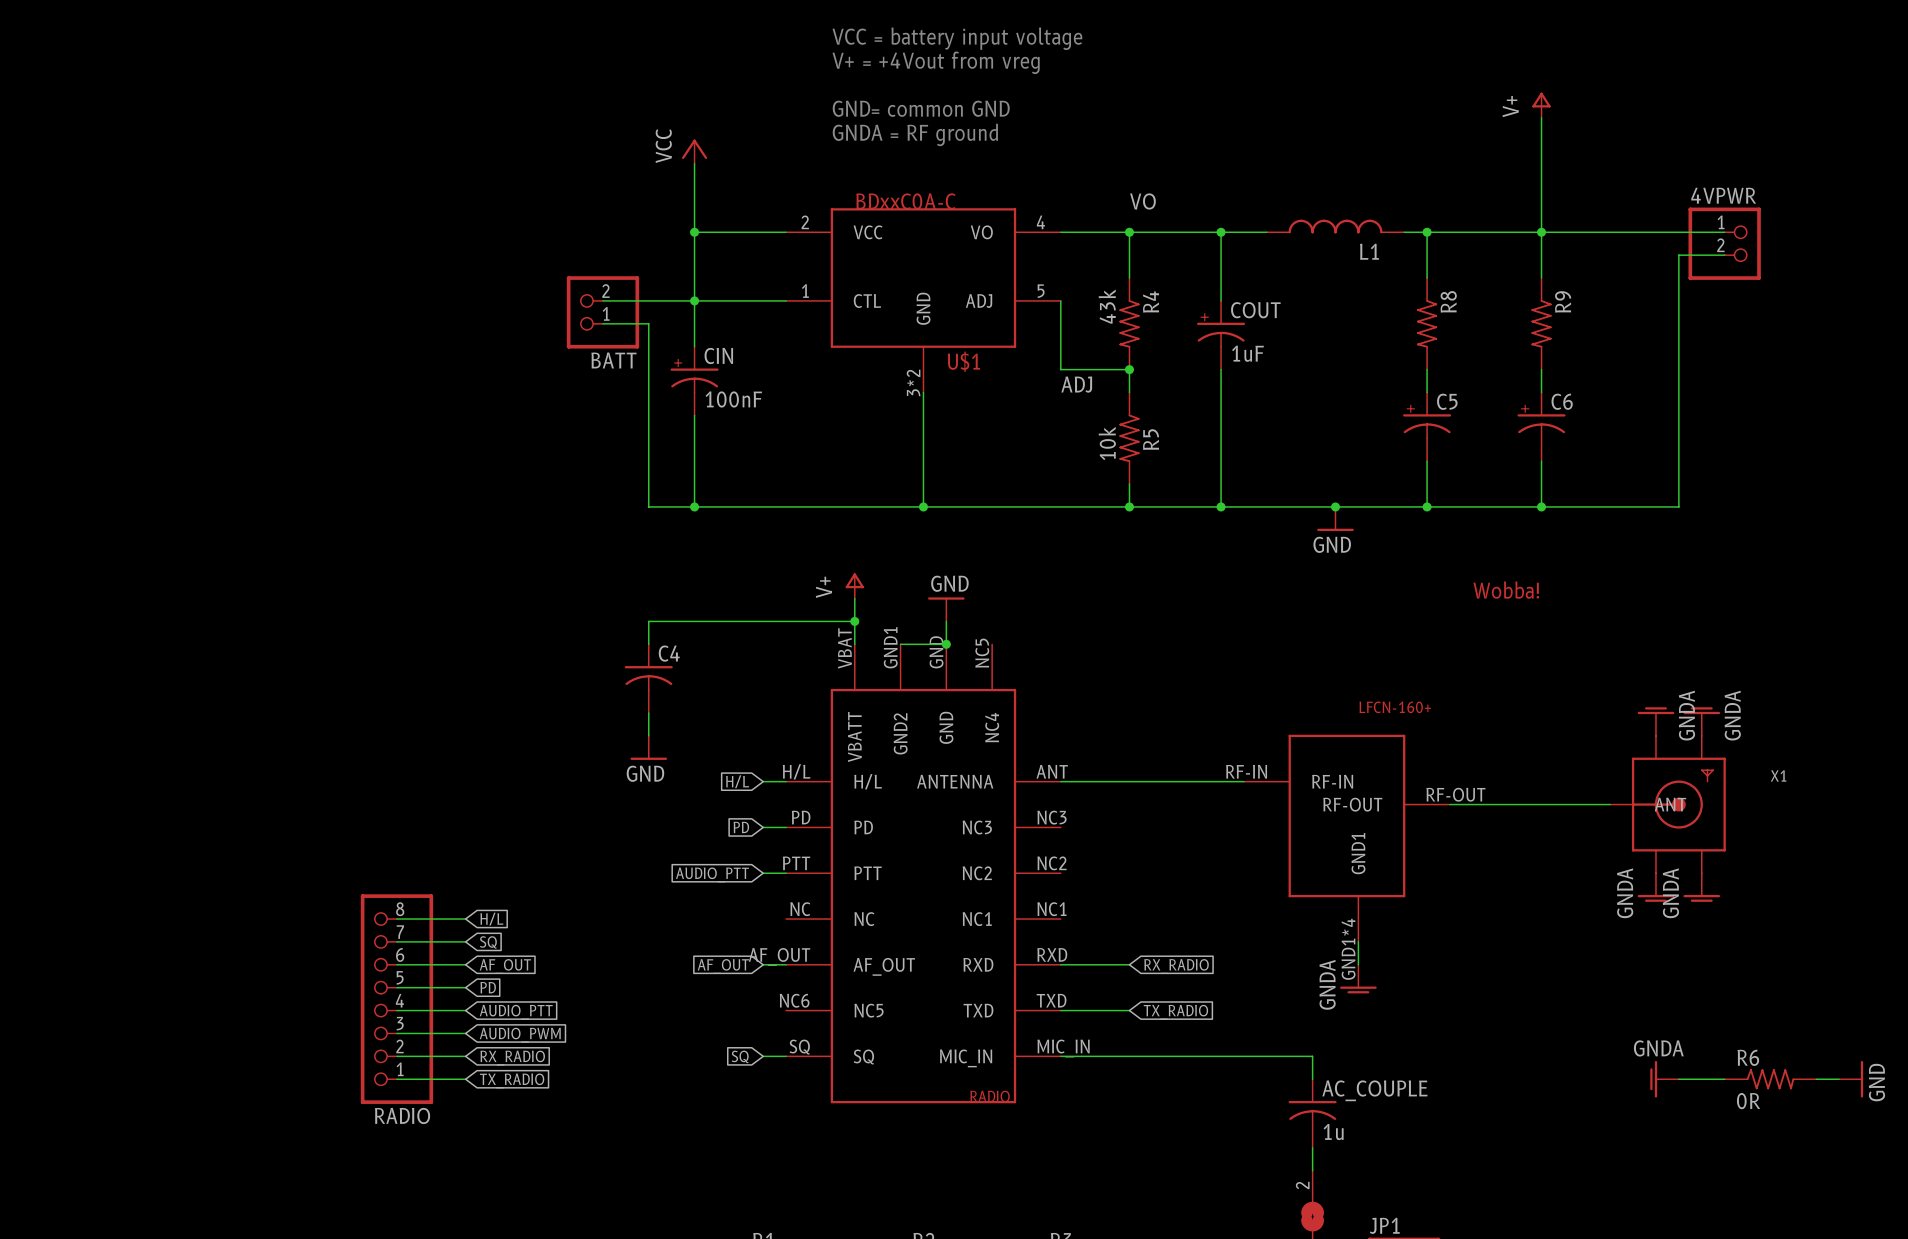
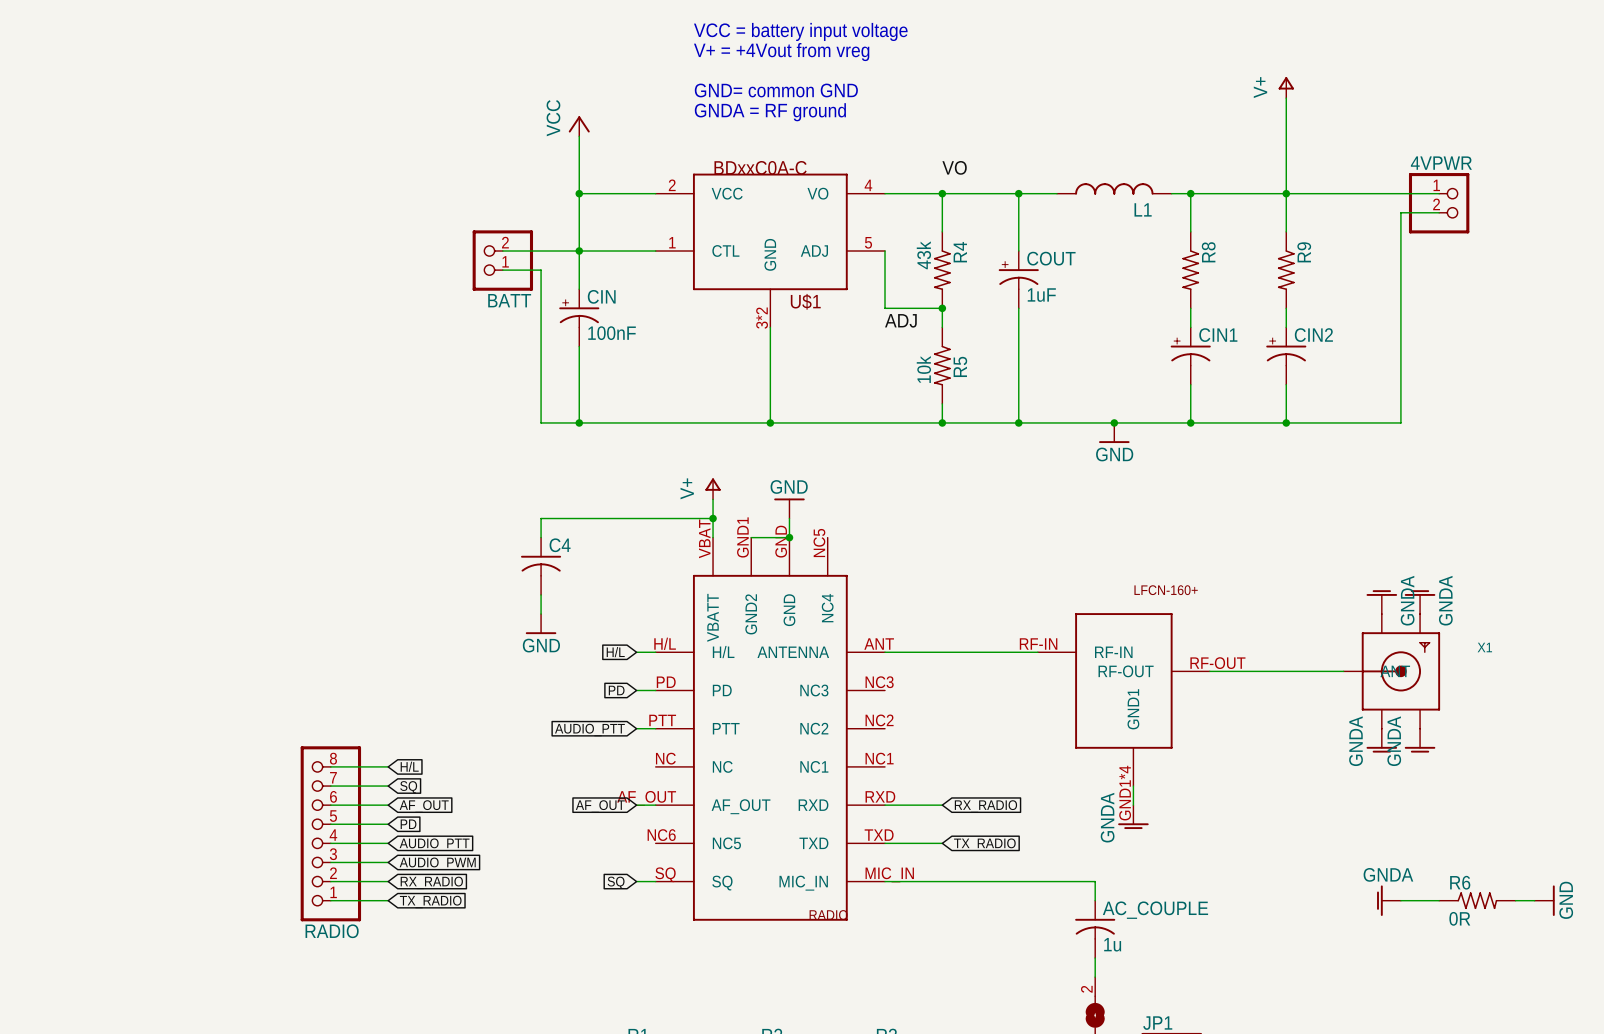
C5 name: C5 (1447, 401) -> CIN1 (1218, 335)
C6 name: C6 (1562, 401) -> CIN2 (1313, 335)
part: (1506, 590) -> none

